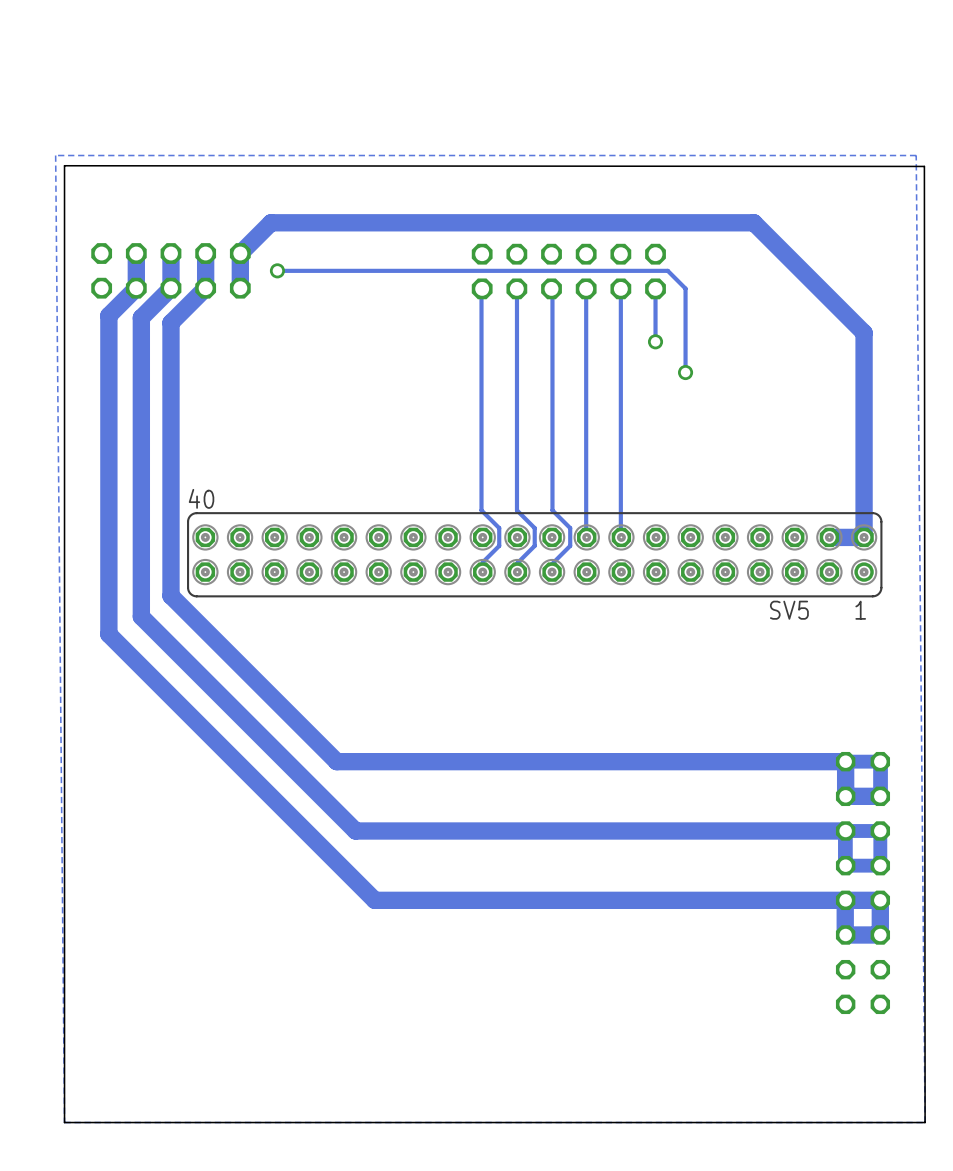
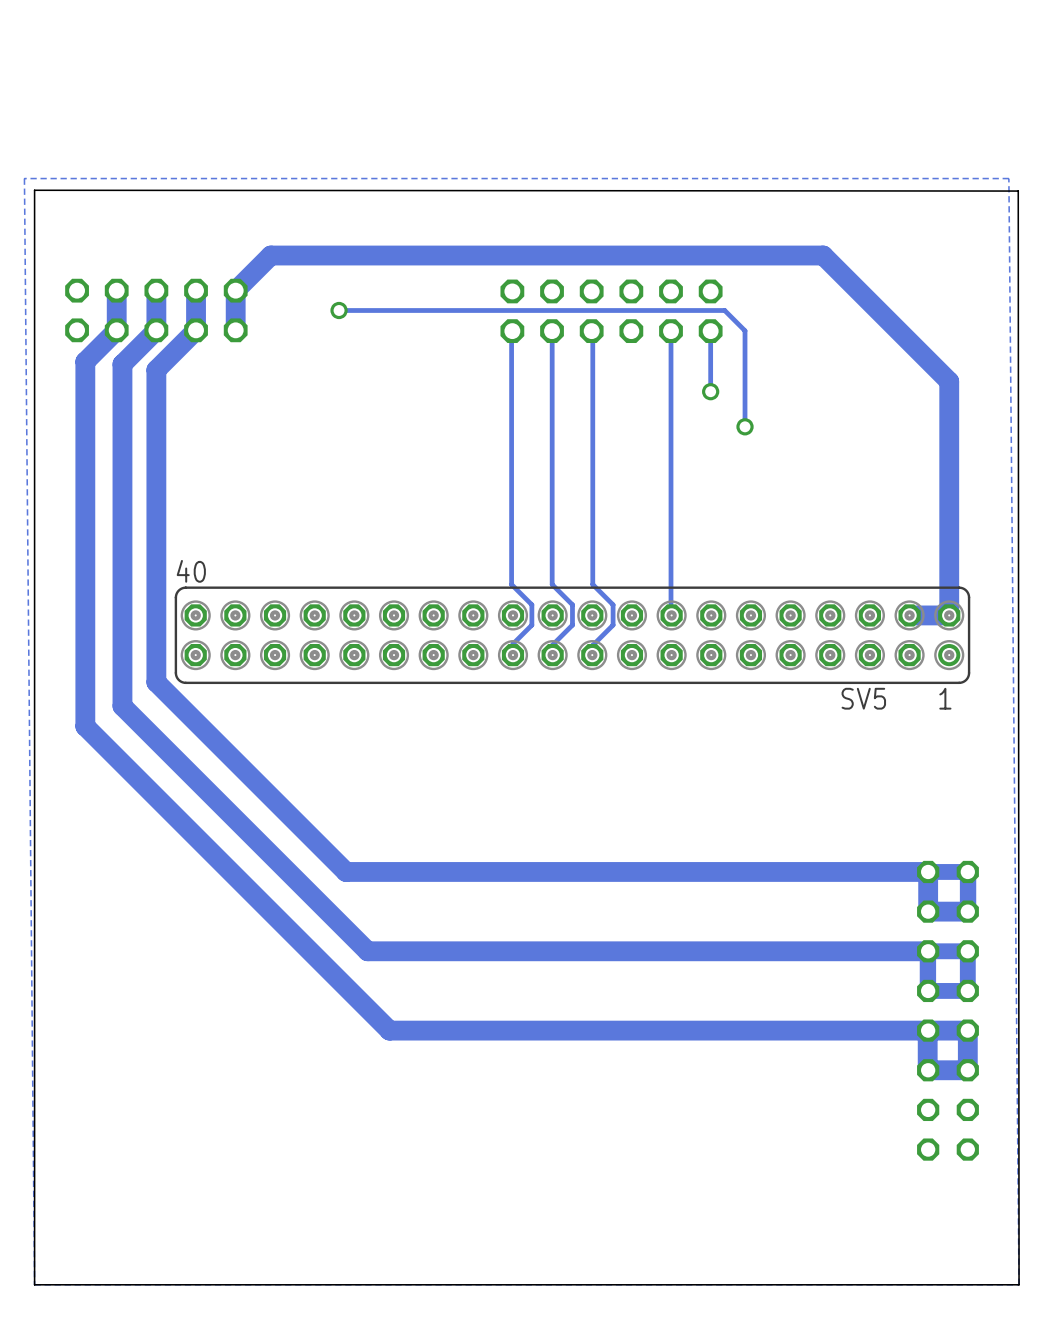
via position: (277, 270) -> (339, 310)
track: (330, 270) (277, 270) -> none
track: (586, 288) (586, 536) -> none

